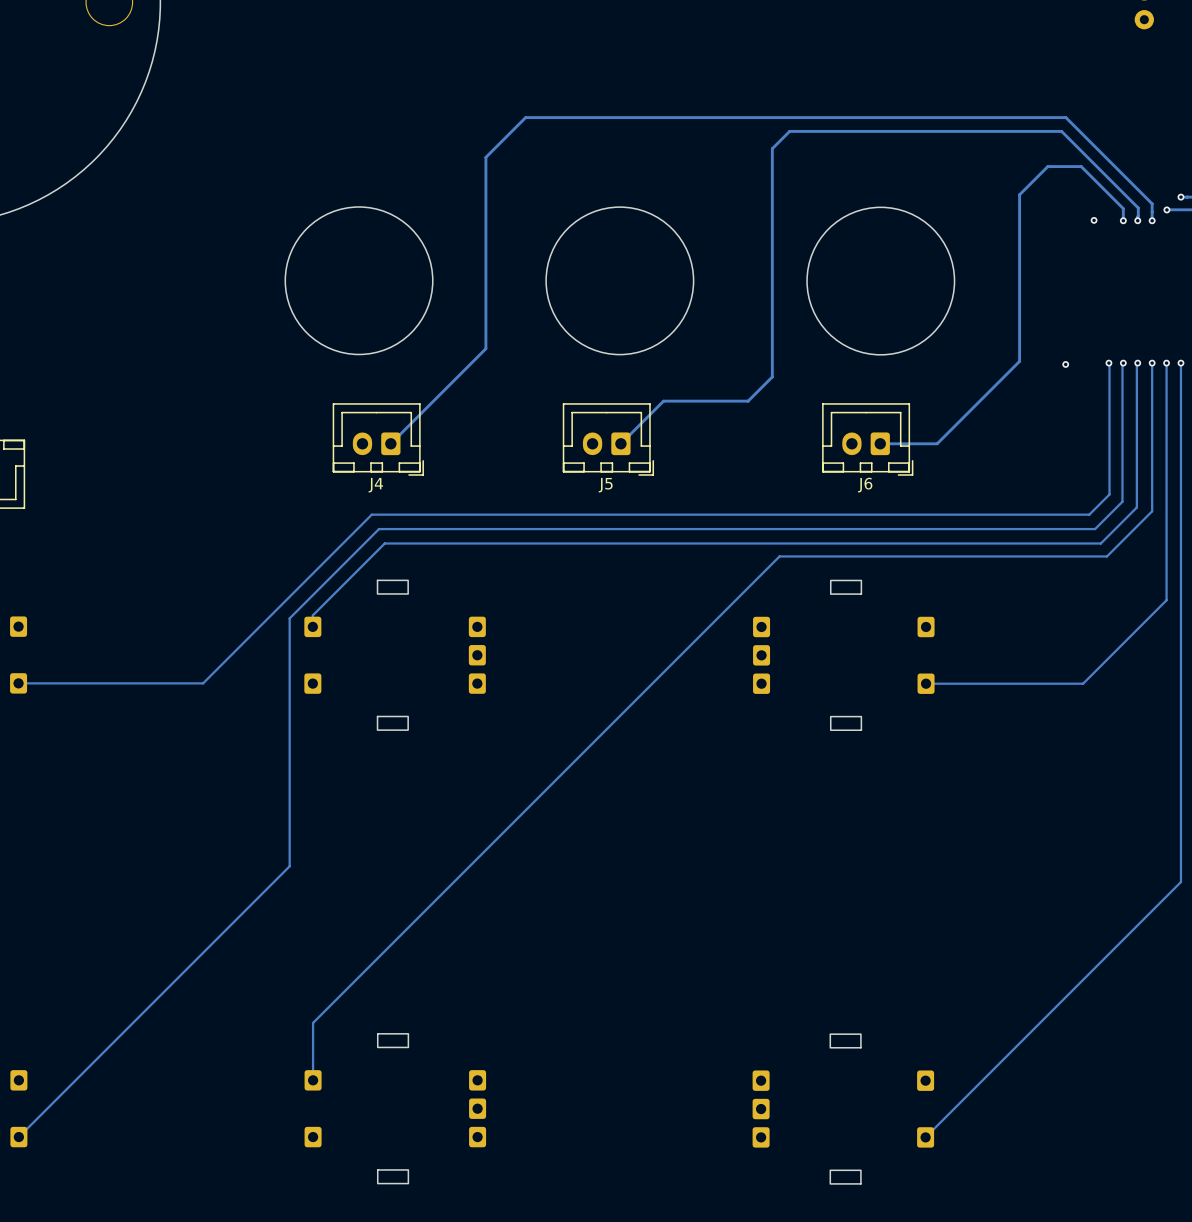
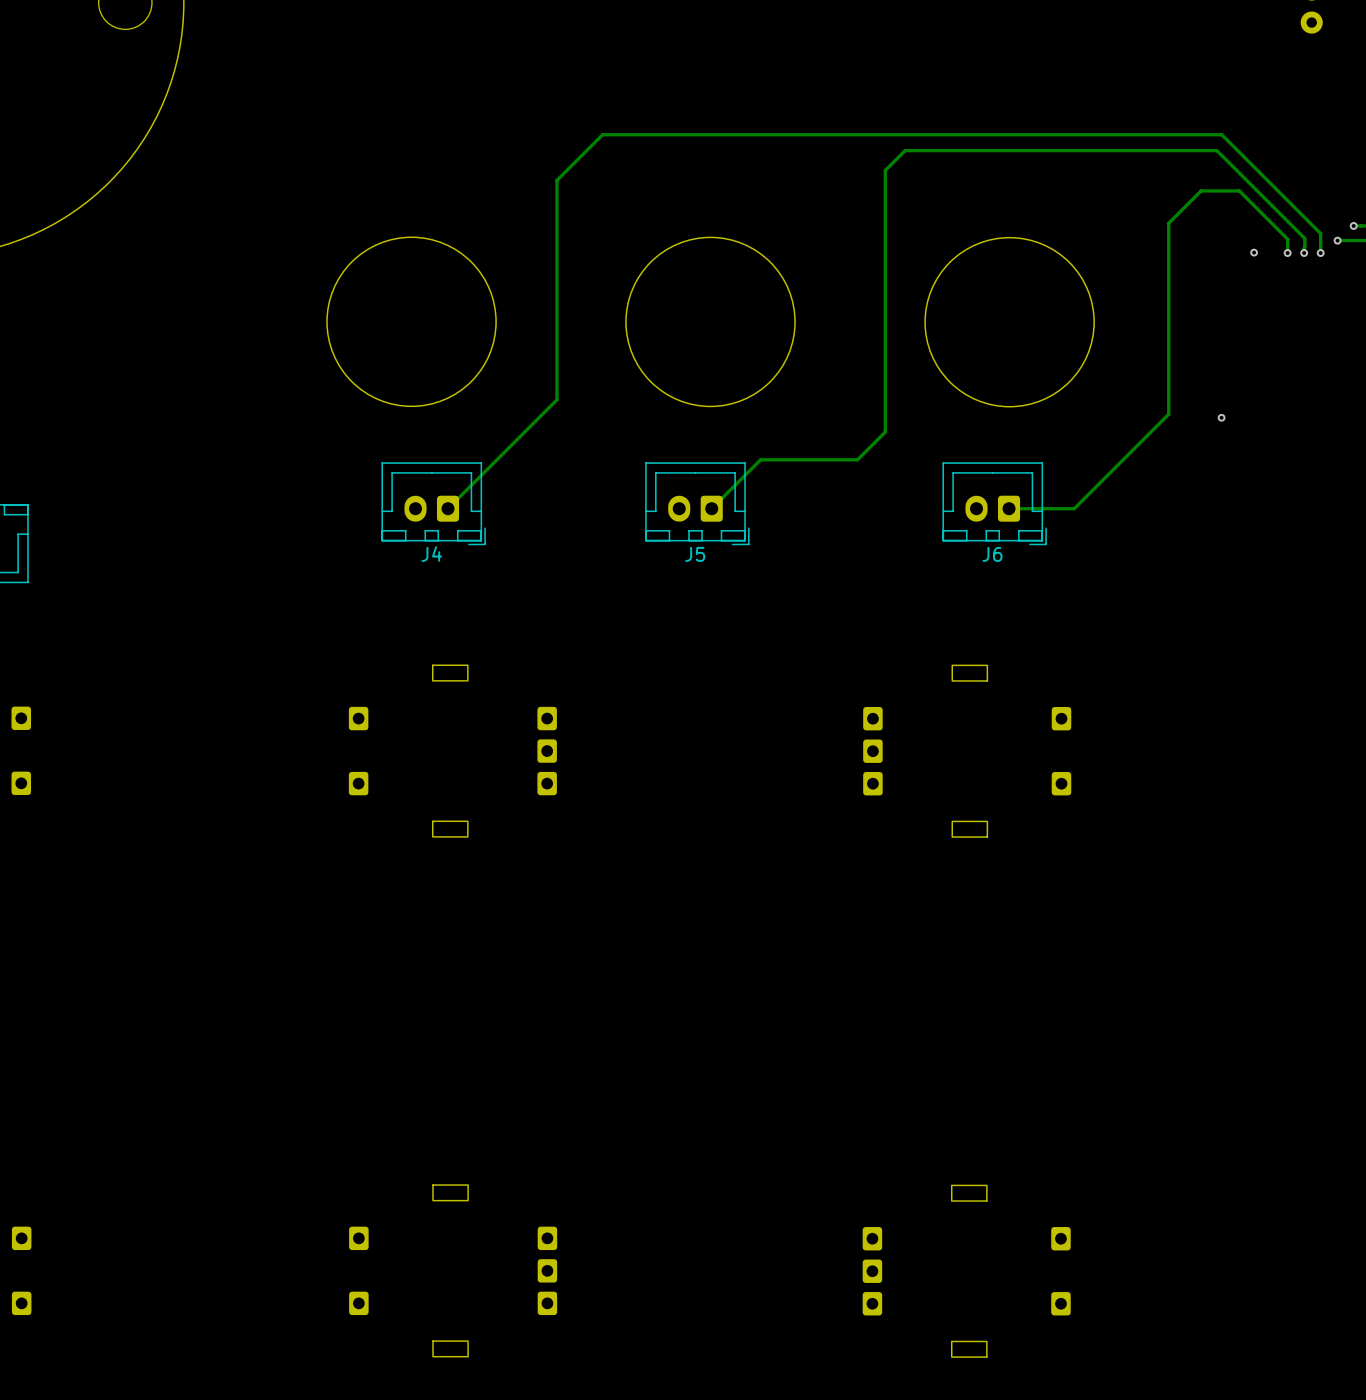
track: (1108, 363) (1109, 494) (1089, 514) (371, 514) (203, 683) (18, 683) -> none
via: (1108, 363) -> none
track: (1123, 363) (1122, 501) (1095, 529) (379, 529) (289, 618) (289, 866) (18, 1137) -> none
via: (1123, 363) -> none
track: (1137, 363) (1136, 507) (1100, 543) (384, 543) (312, 615) (312, 626) -> none
via: (1137, 363) -> none
track: (1152, 363) (1152, 511) (1106, 556) (779, 556) (313, 1022) (313, 1080) -> none
via: (1152, 363) -> none
track: (1166, 363) (1166, 600) (1083, 683) (926, 683) -> none
via: (1166, 363) -> none
track: (1180, 363) (1180, 882) (925, 1137) -> none
via: (1180, 363) -> none

